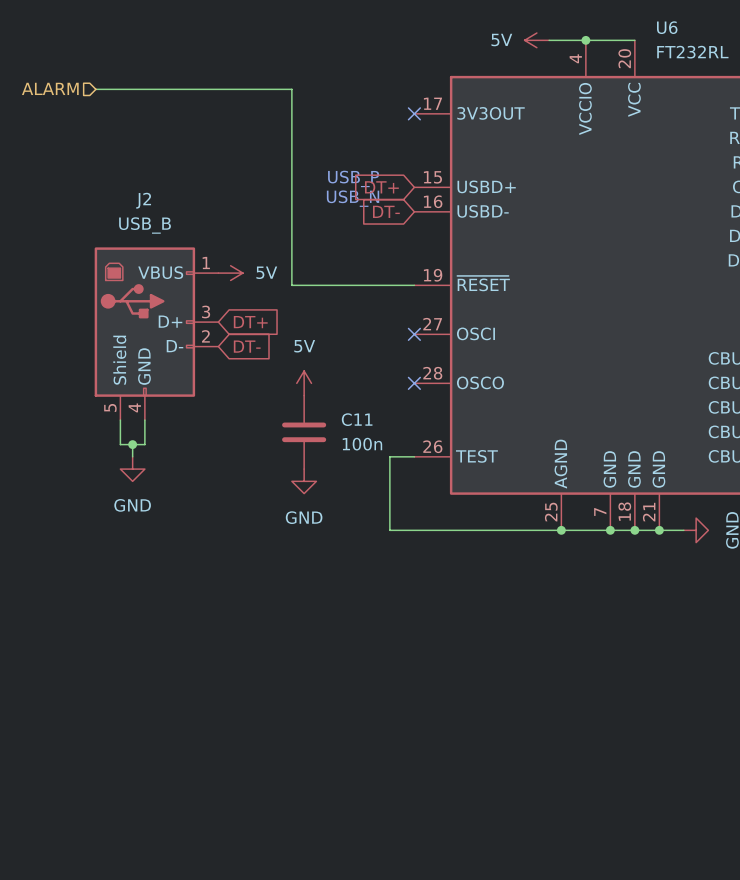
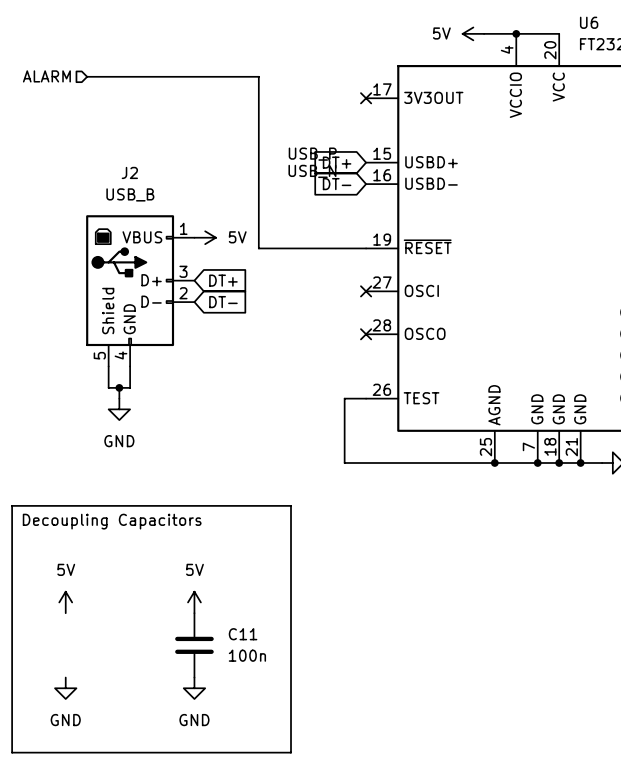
power symbol: 5V (304, 383) -> none
C11 position: (304, 432) -> (194, 645)
power symbol: GND (304, 481) -> none
line: none -> (12, 505) (291, 505) (291, 752) (12, 752) (12, 505)
text: none -> Decoupling Capacitors (112, 521)
power symbol: none -> 5V (65, 602)
power symbol: none -> 5V (194, 602)
power symbol: none -> GND (65, 688)
power symbol: none -> GND (194, 688)

